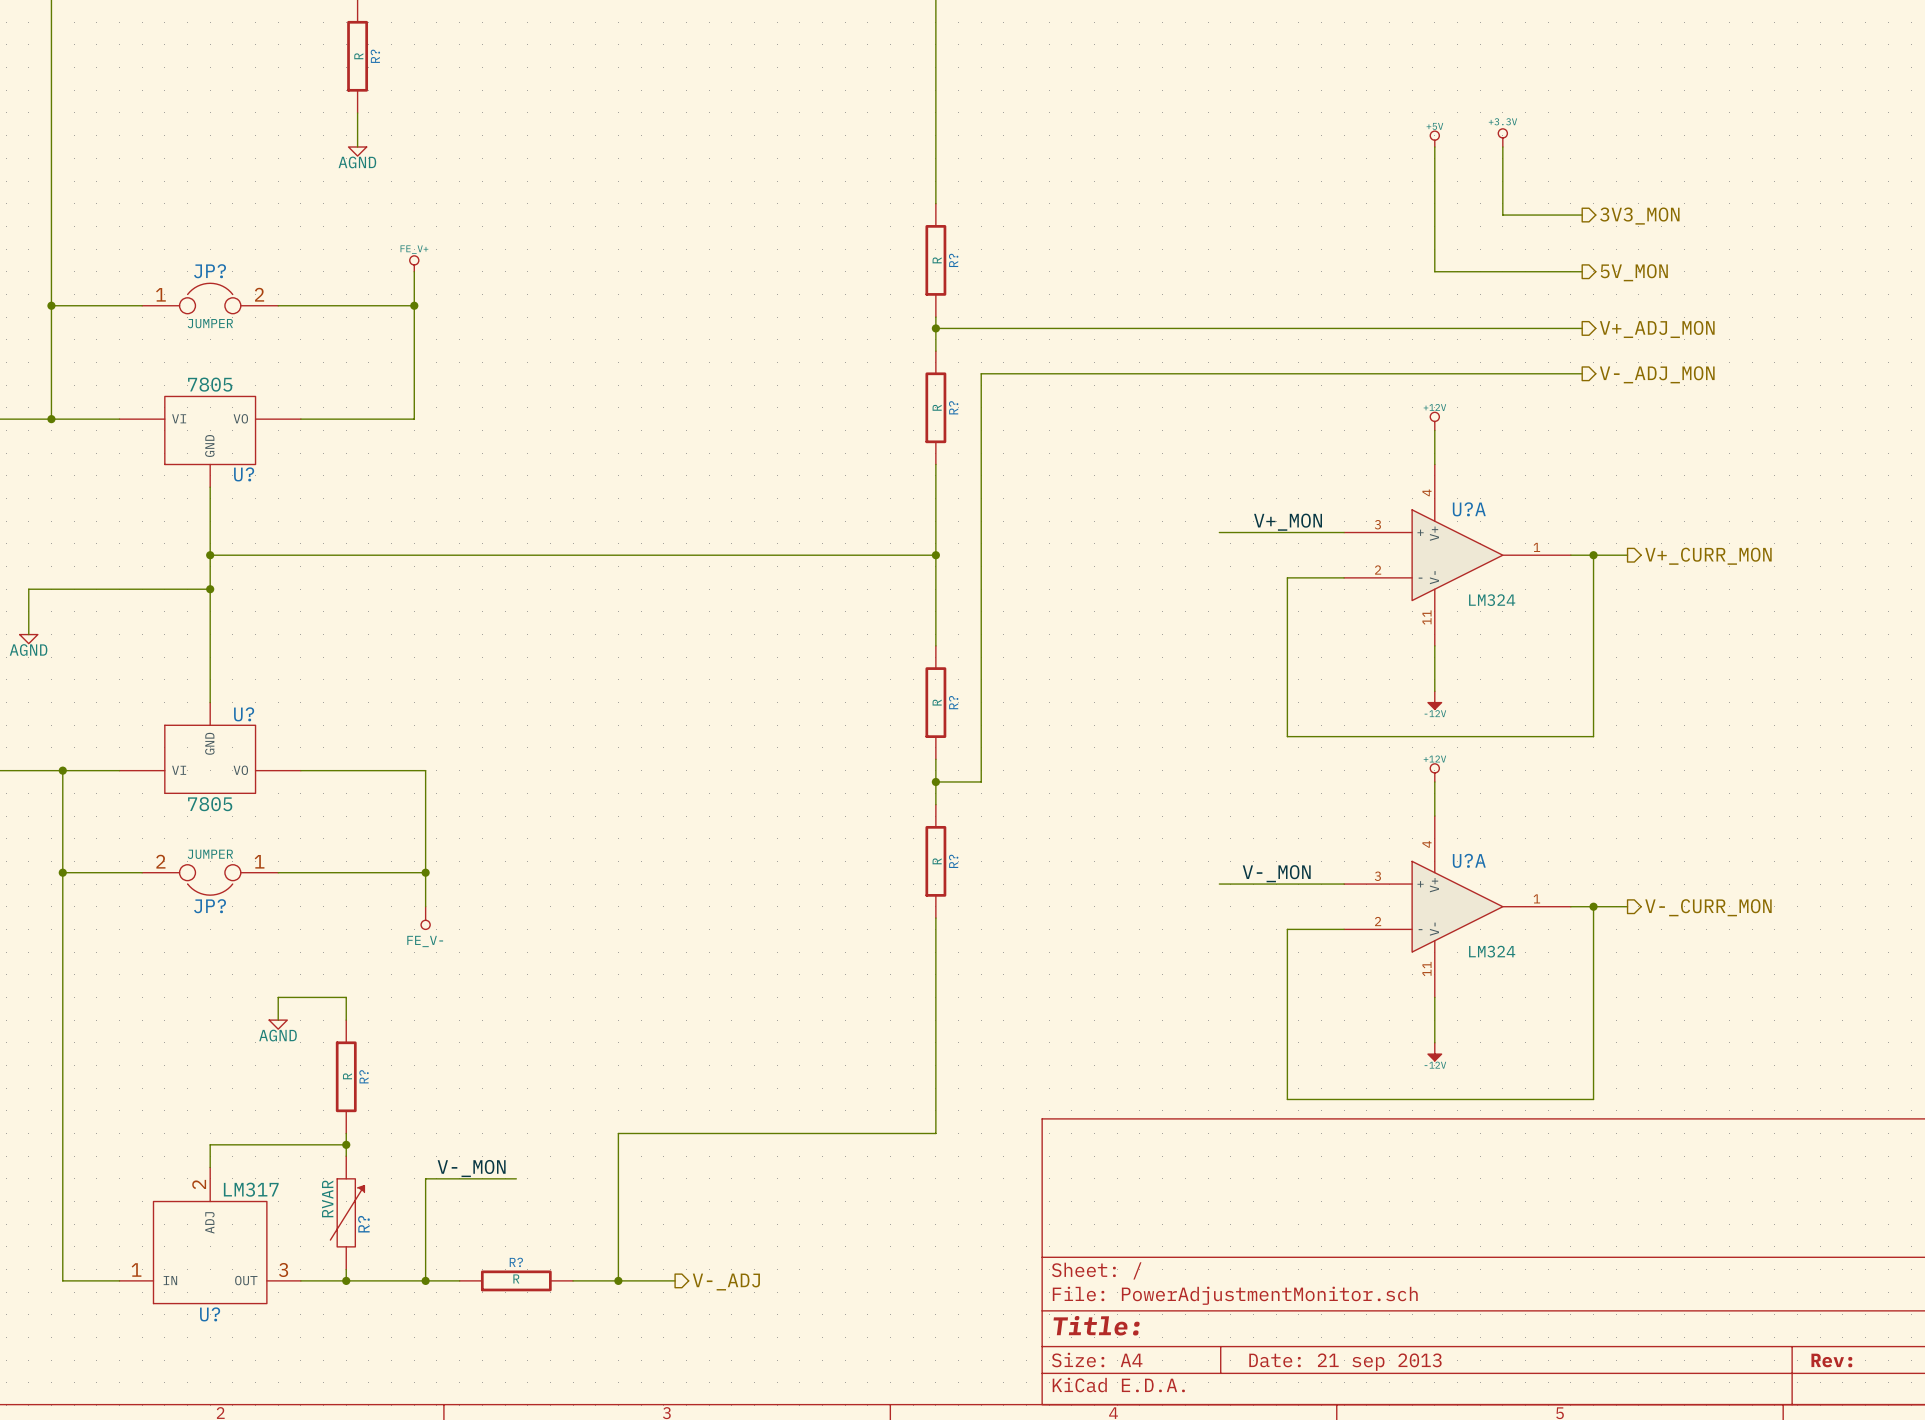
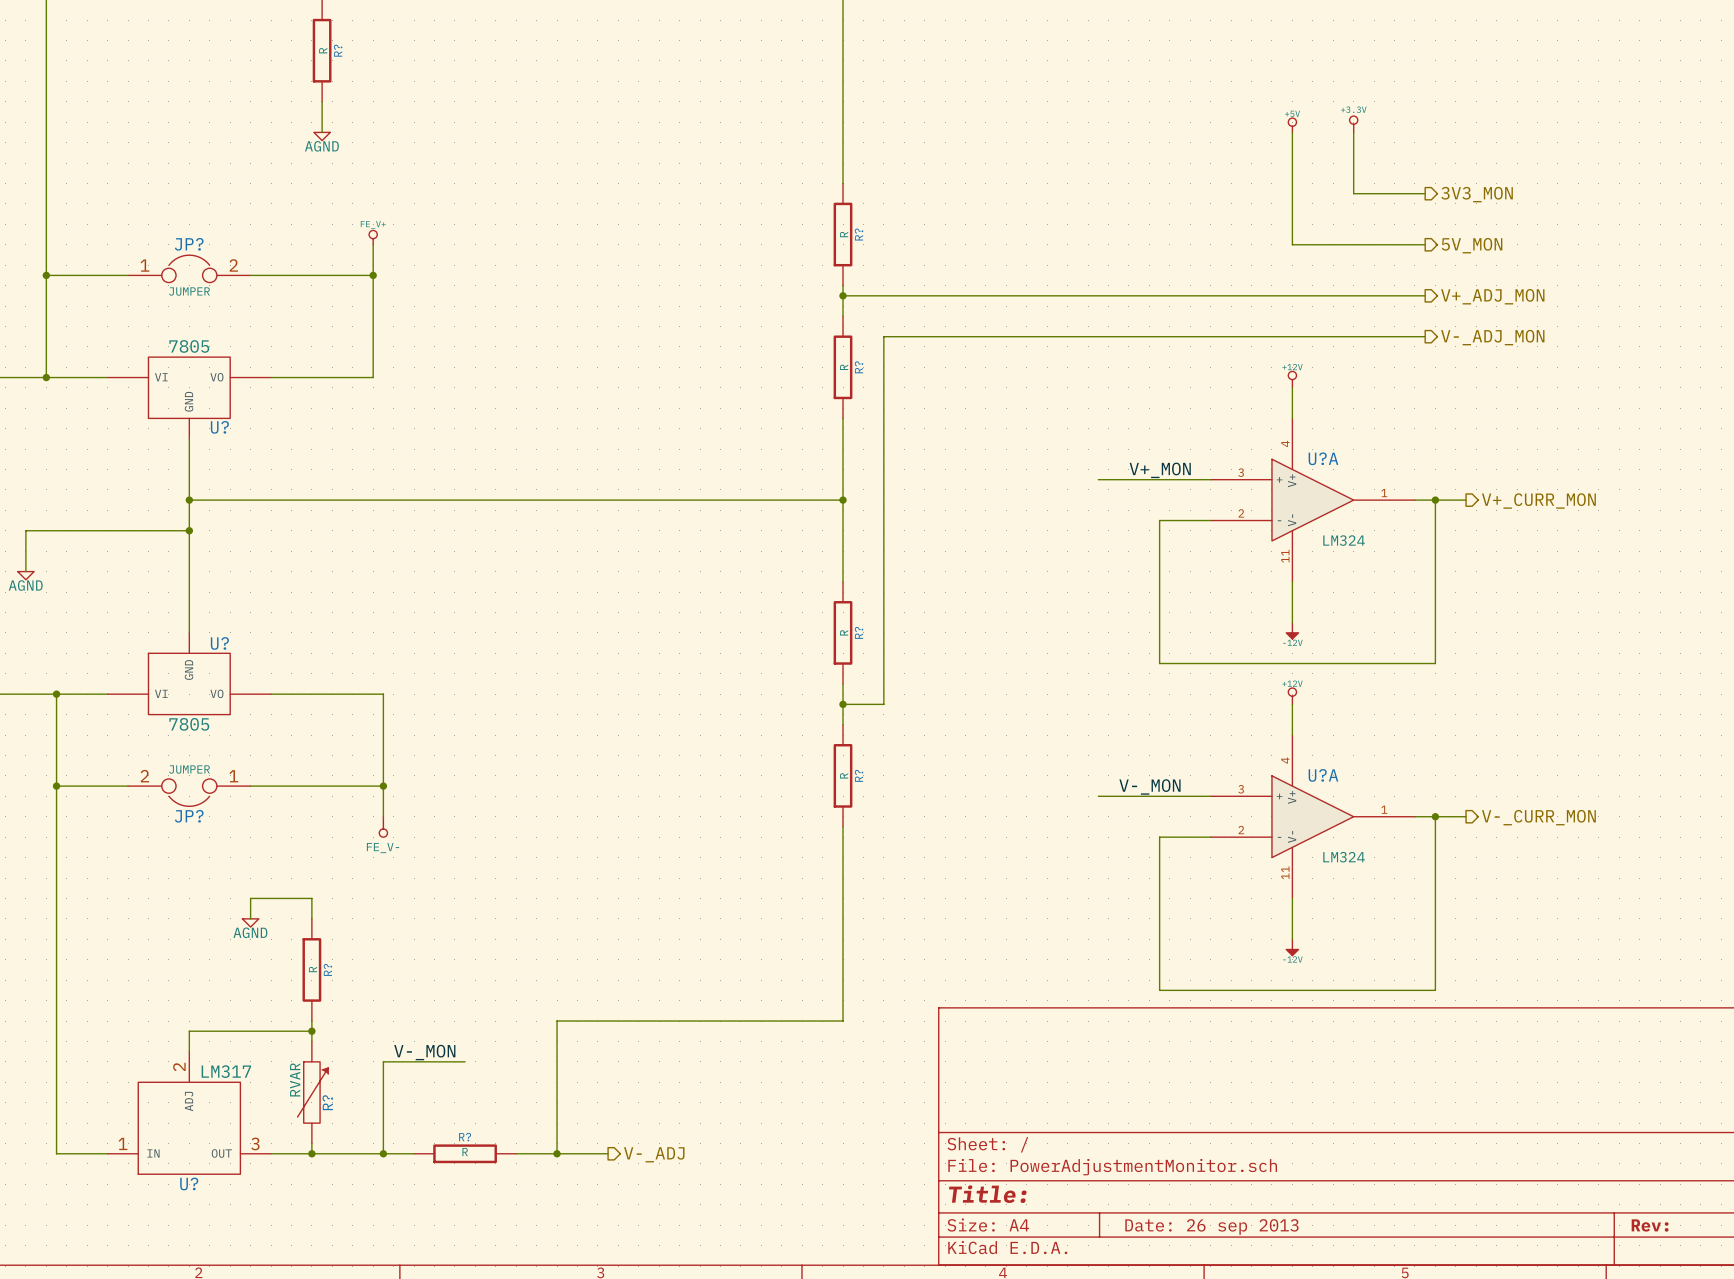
title block: Date: 21 sep 2013 (1345, 1362) -> Date: 26 sep 2013 (1211, 1226)

